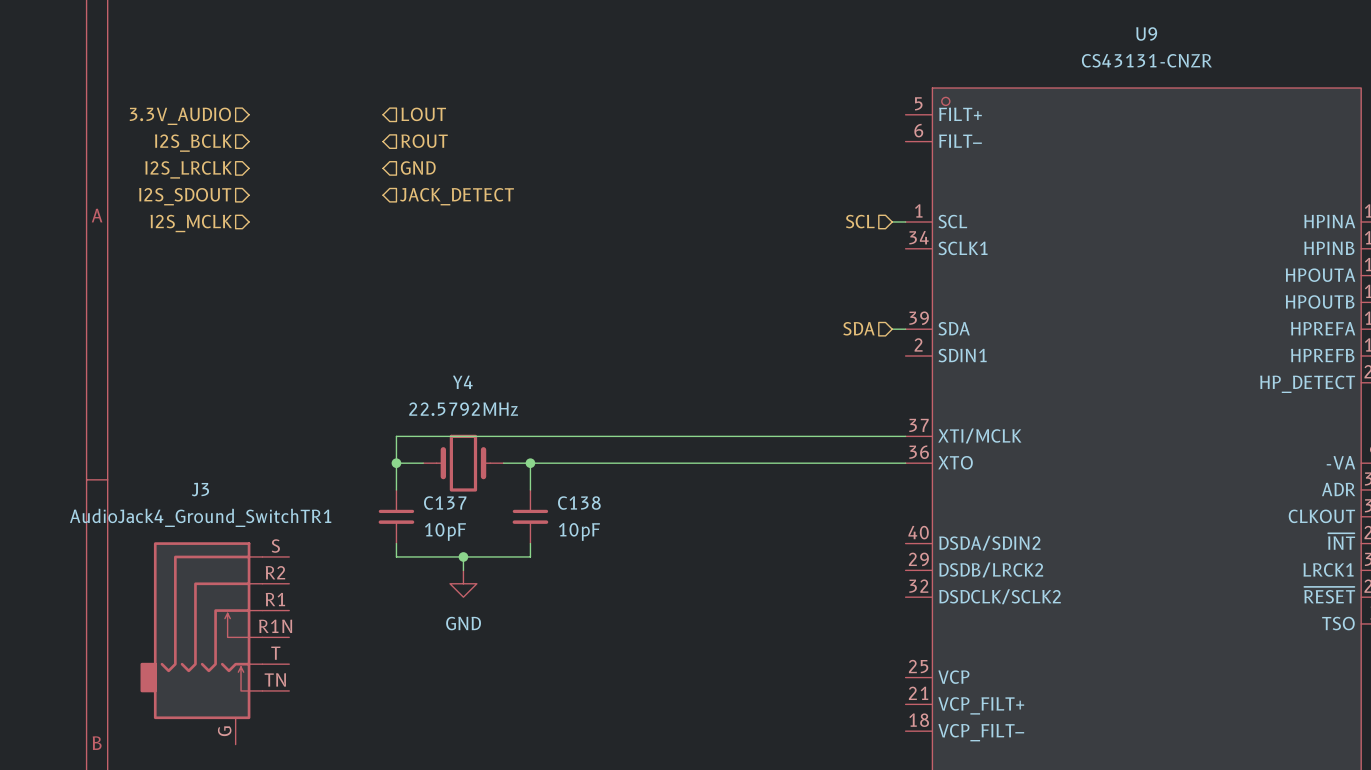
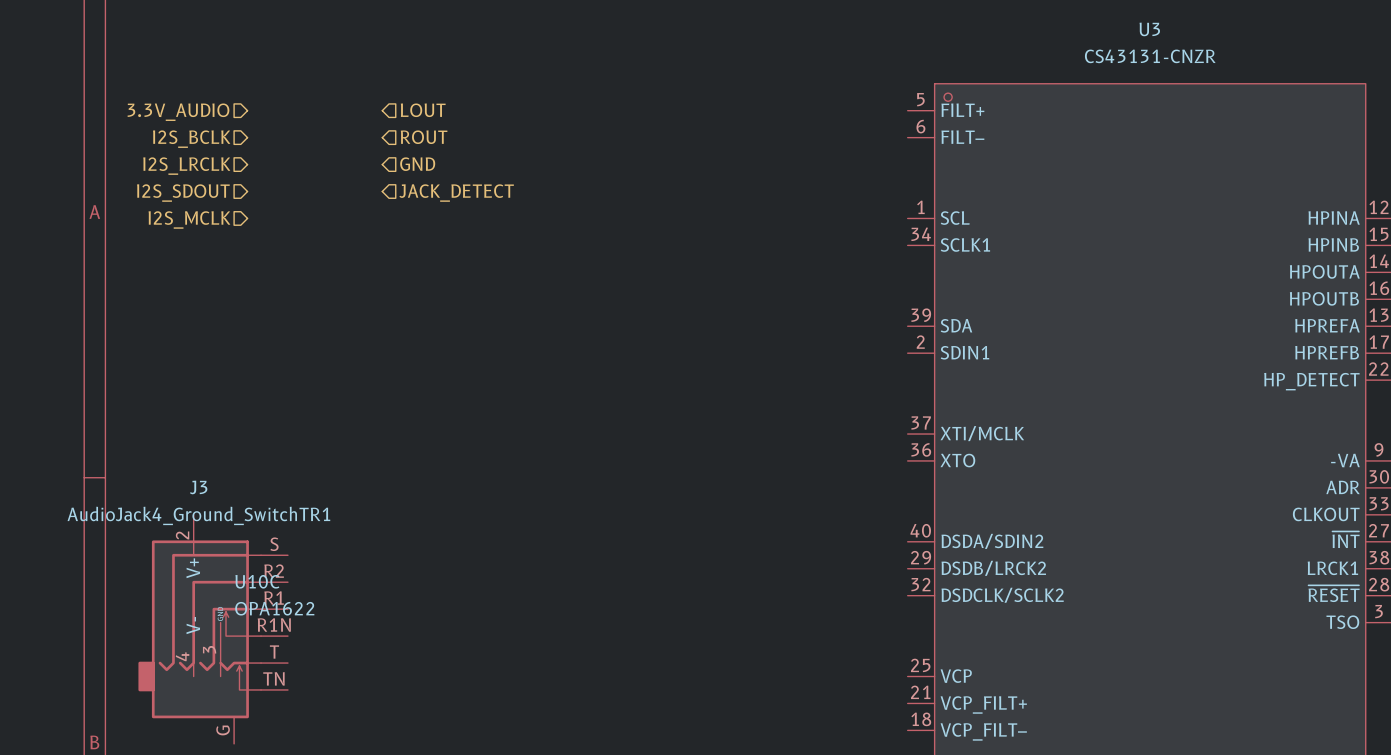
U9 name: U9 (1146, 33) -> U3 (1149, 29)
hierarchical label: SCL (860, 221) -> none
wire: (892, 222) (905, 222) -> none
hierarchical label: SDA (858, 328) -> none
wire: (892, 329) (905, 329) -> none
wire: (905, 436) (396, 436) (396, 489) -> none
wire: (396, 463) (423, 463) -> none
junction: (396, 463) -> none
Y4: 22.5792MHz (463, 463) -> none
wire: (503, 463) (905, 463) -> none
wire: (530, 463) (530, 489) -> none
junction: (530, 463) -> none
C137: 10pF (396, 516) -> none
C138: 10pF (530, 516) -> none
wire: (396, 543) (396, 556) (530, 556) (530, 543) -> none
wire: (463, 556) (463, 570) -> none
junction: (463, 556) -> none
power symbol: GND (463, 583) -> none
U10C: none -> OPA1622 (207, 595)

